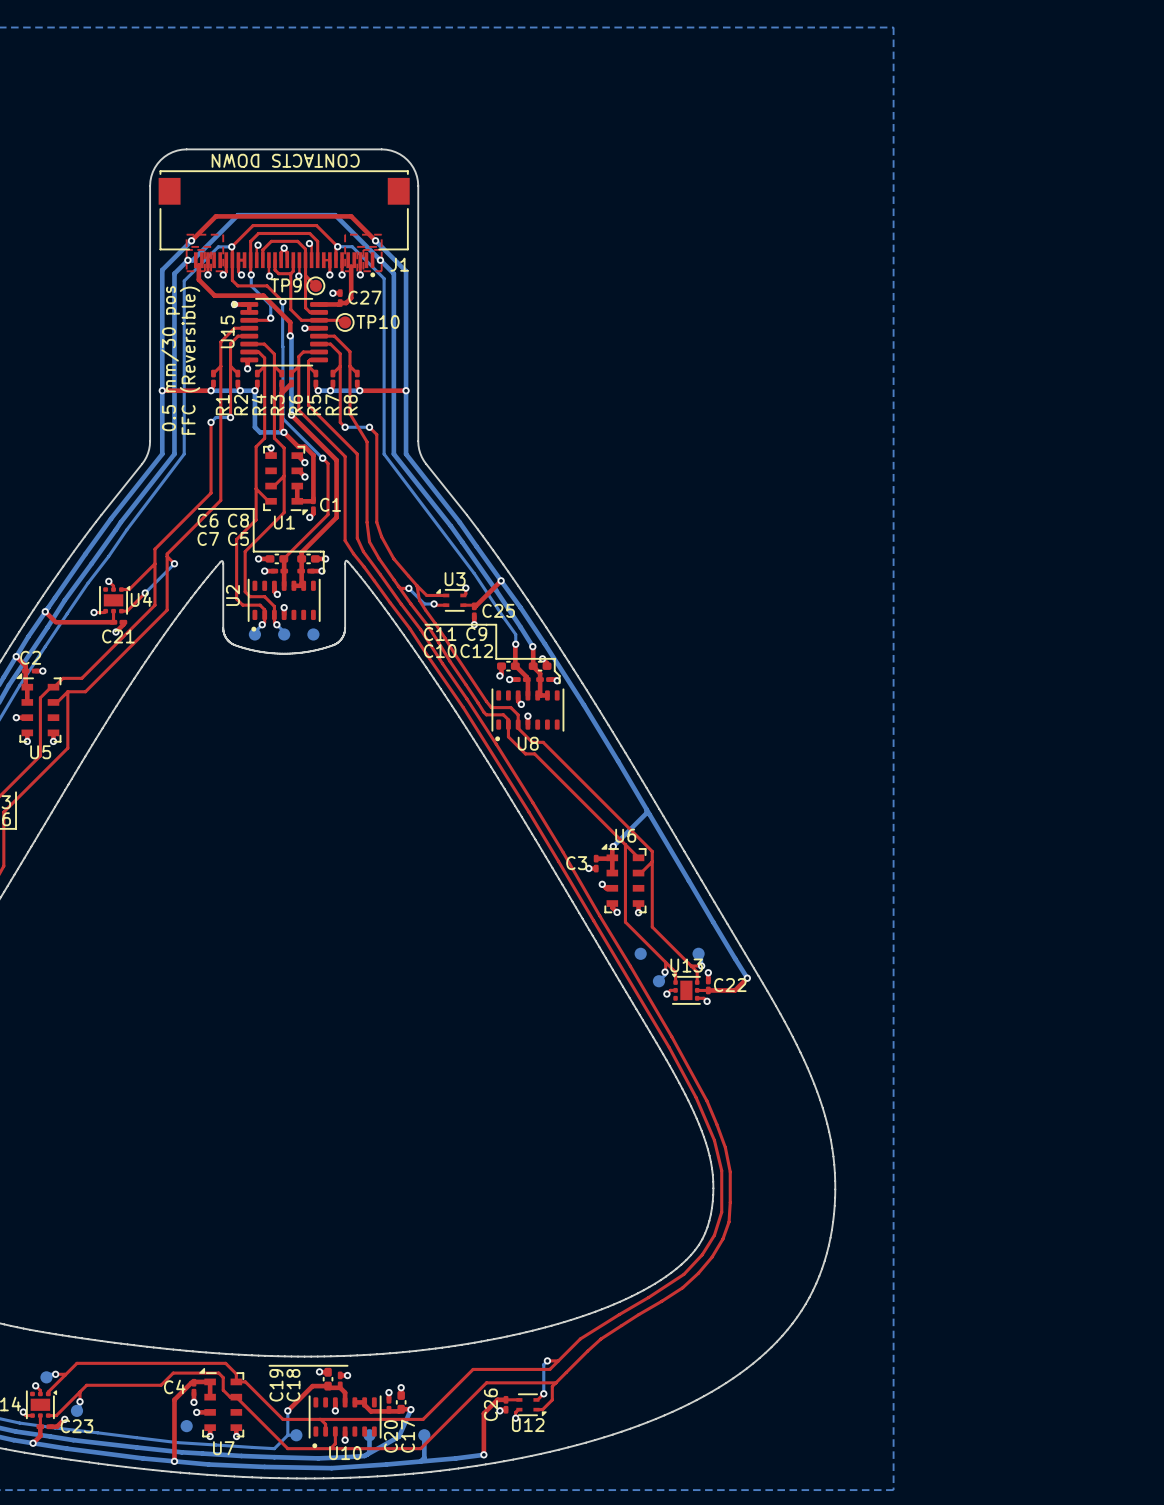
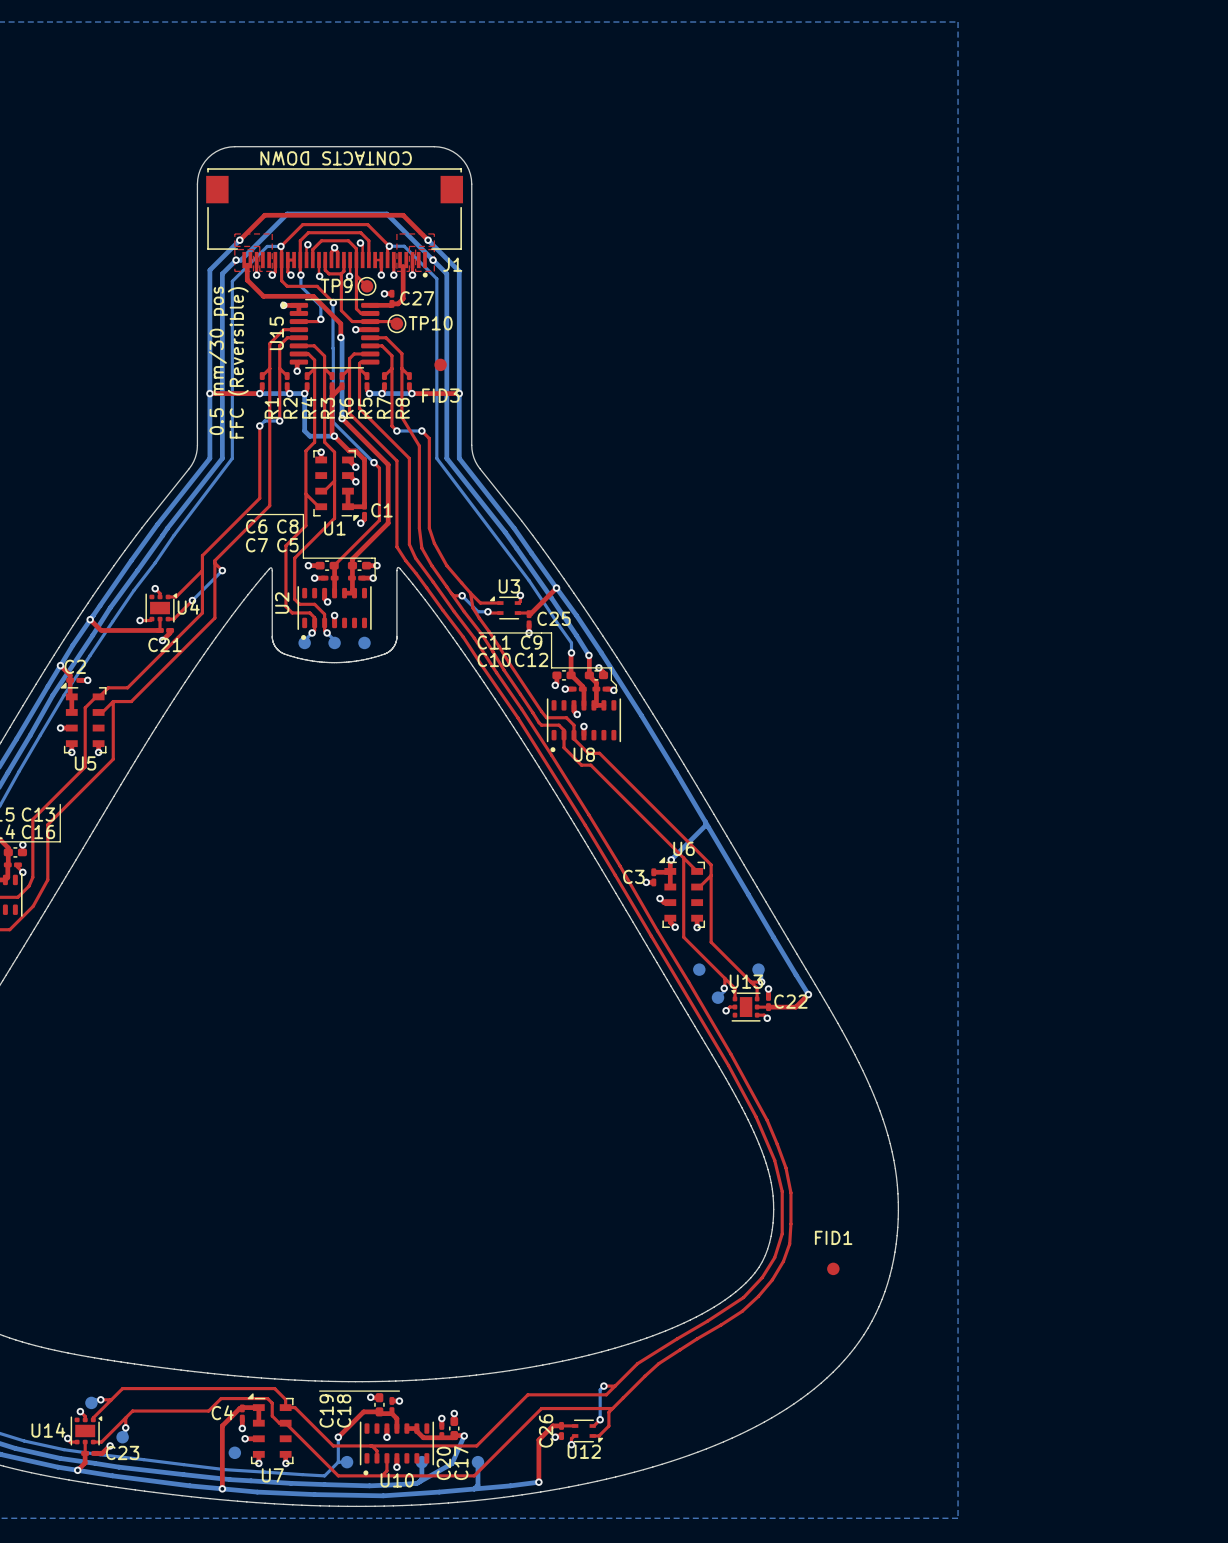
FID3: none -> (440, 364)
FID1: none -> (833, 1268)

